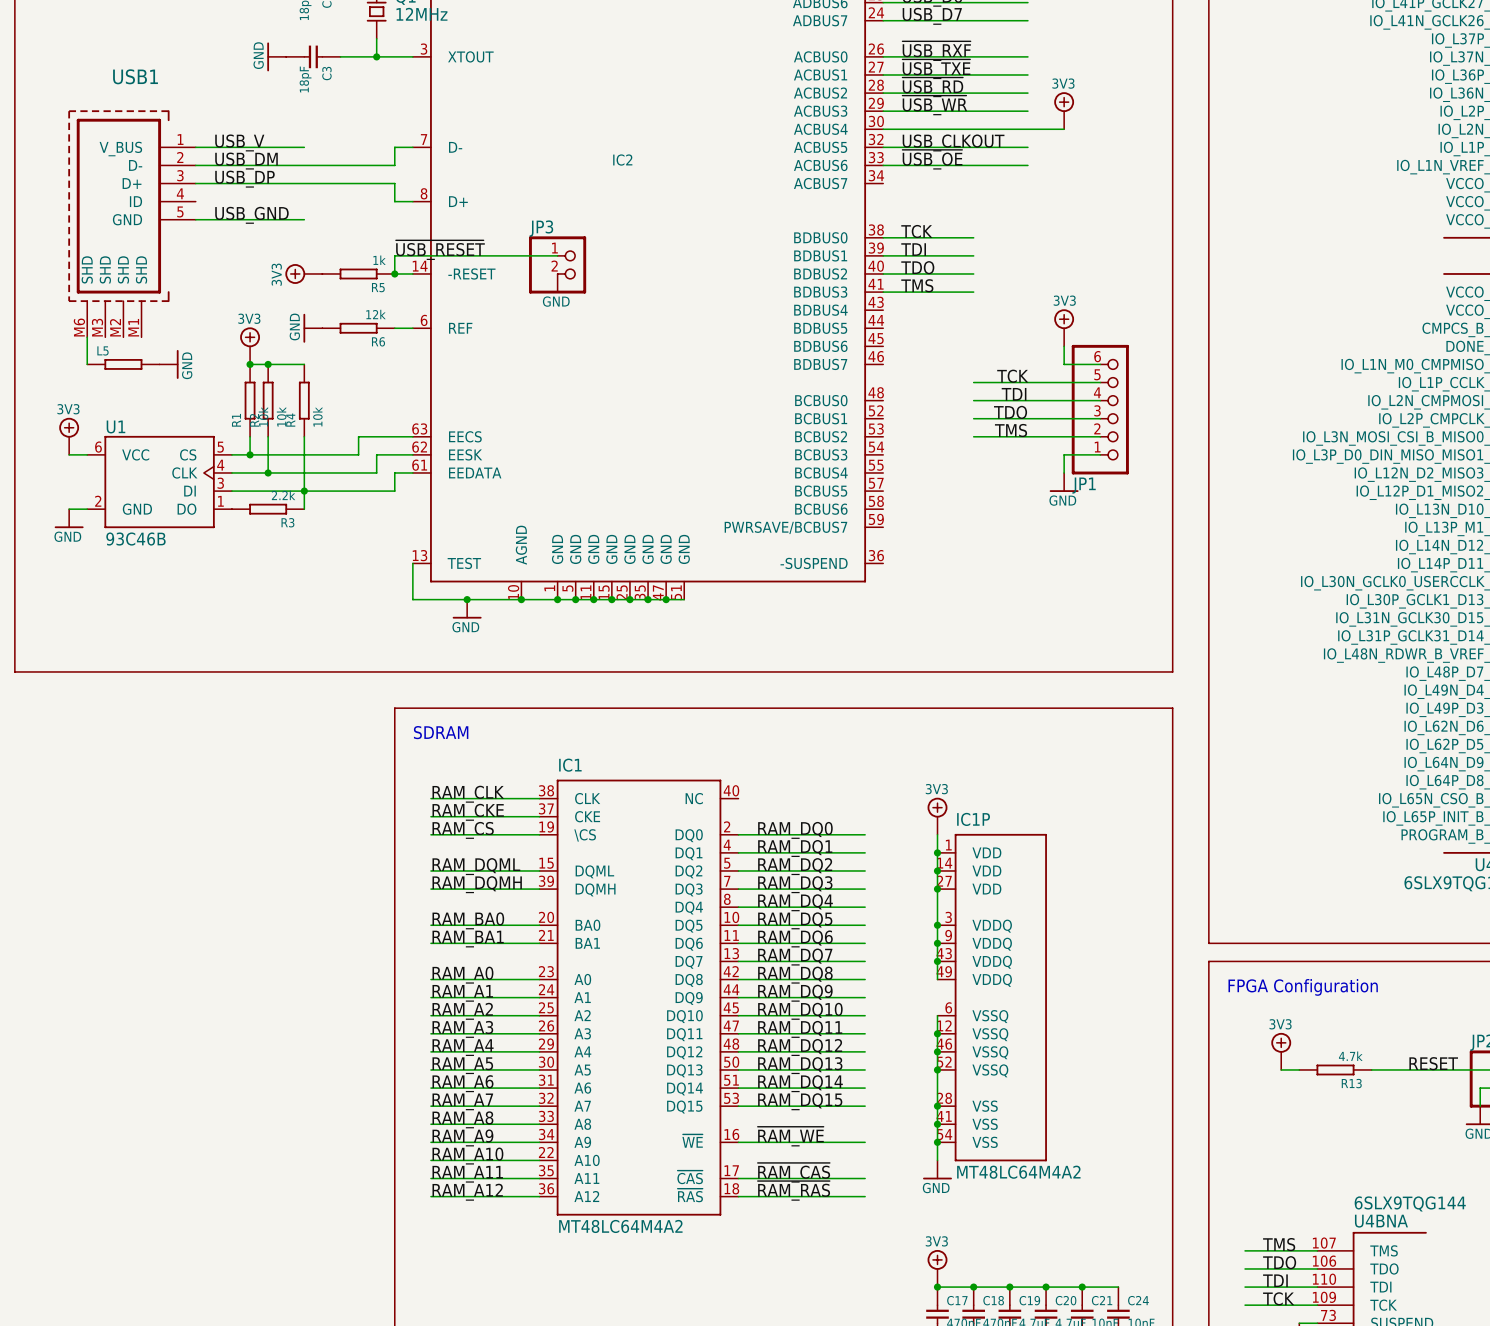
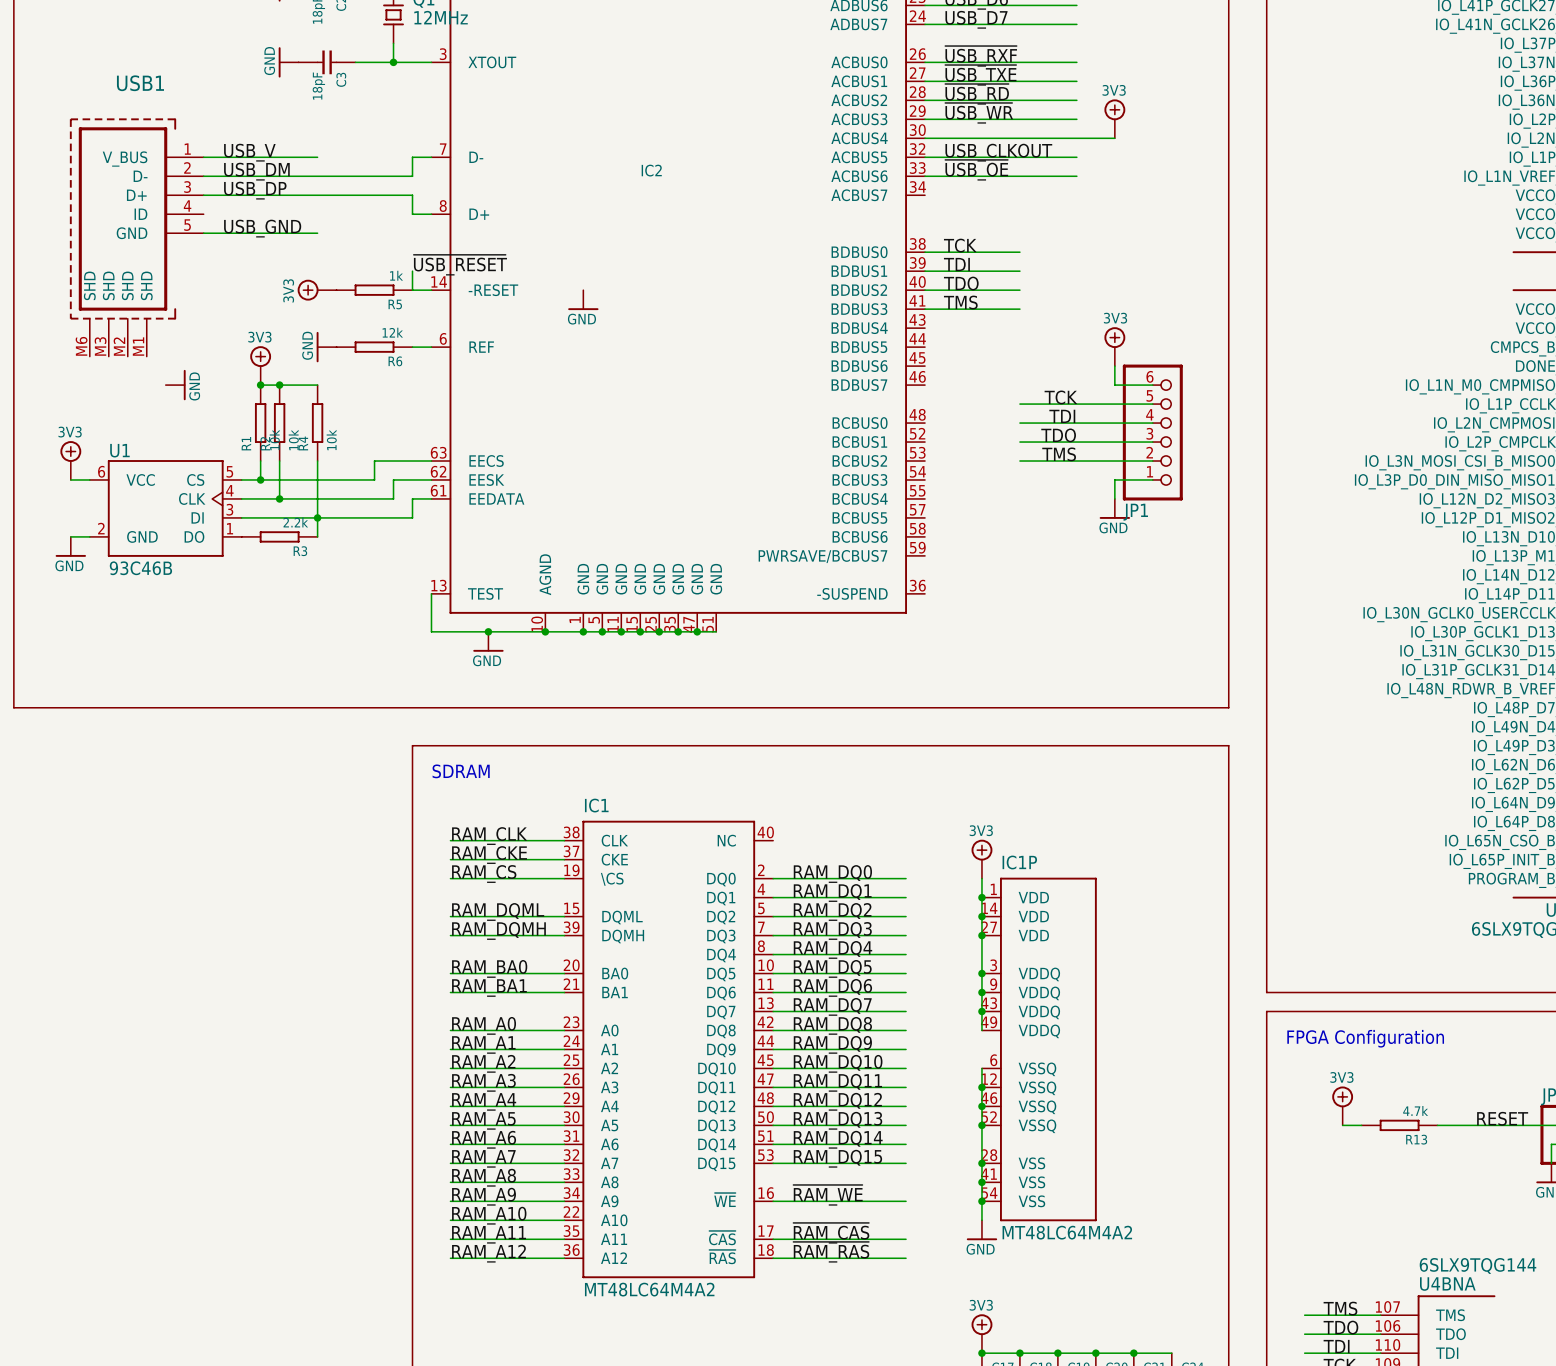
wire: (394, 255) (557, 255) -> none
JP3: (557, 264) -> none
junction: (394, 273) -> none
wire: (87, 337) (87, 364) -> none
L5: (123, 364) -> none

